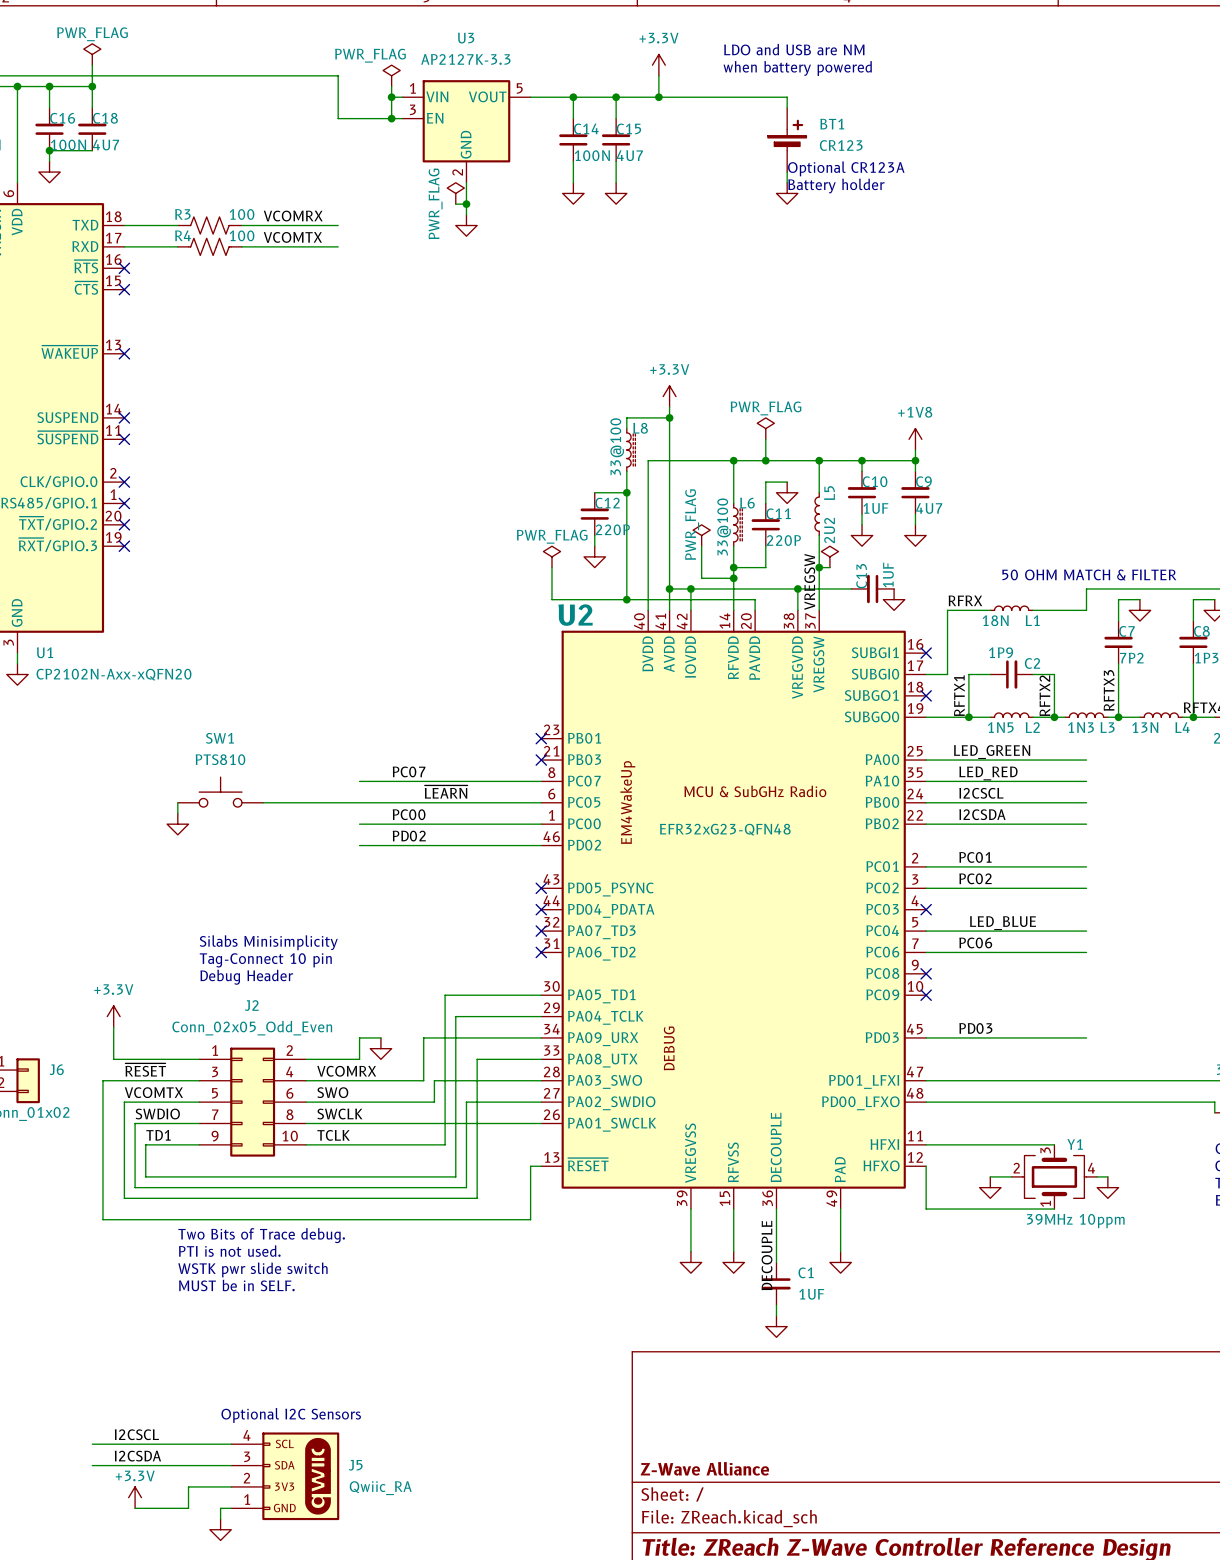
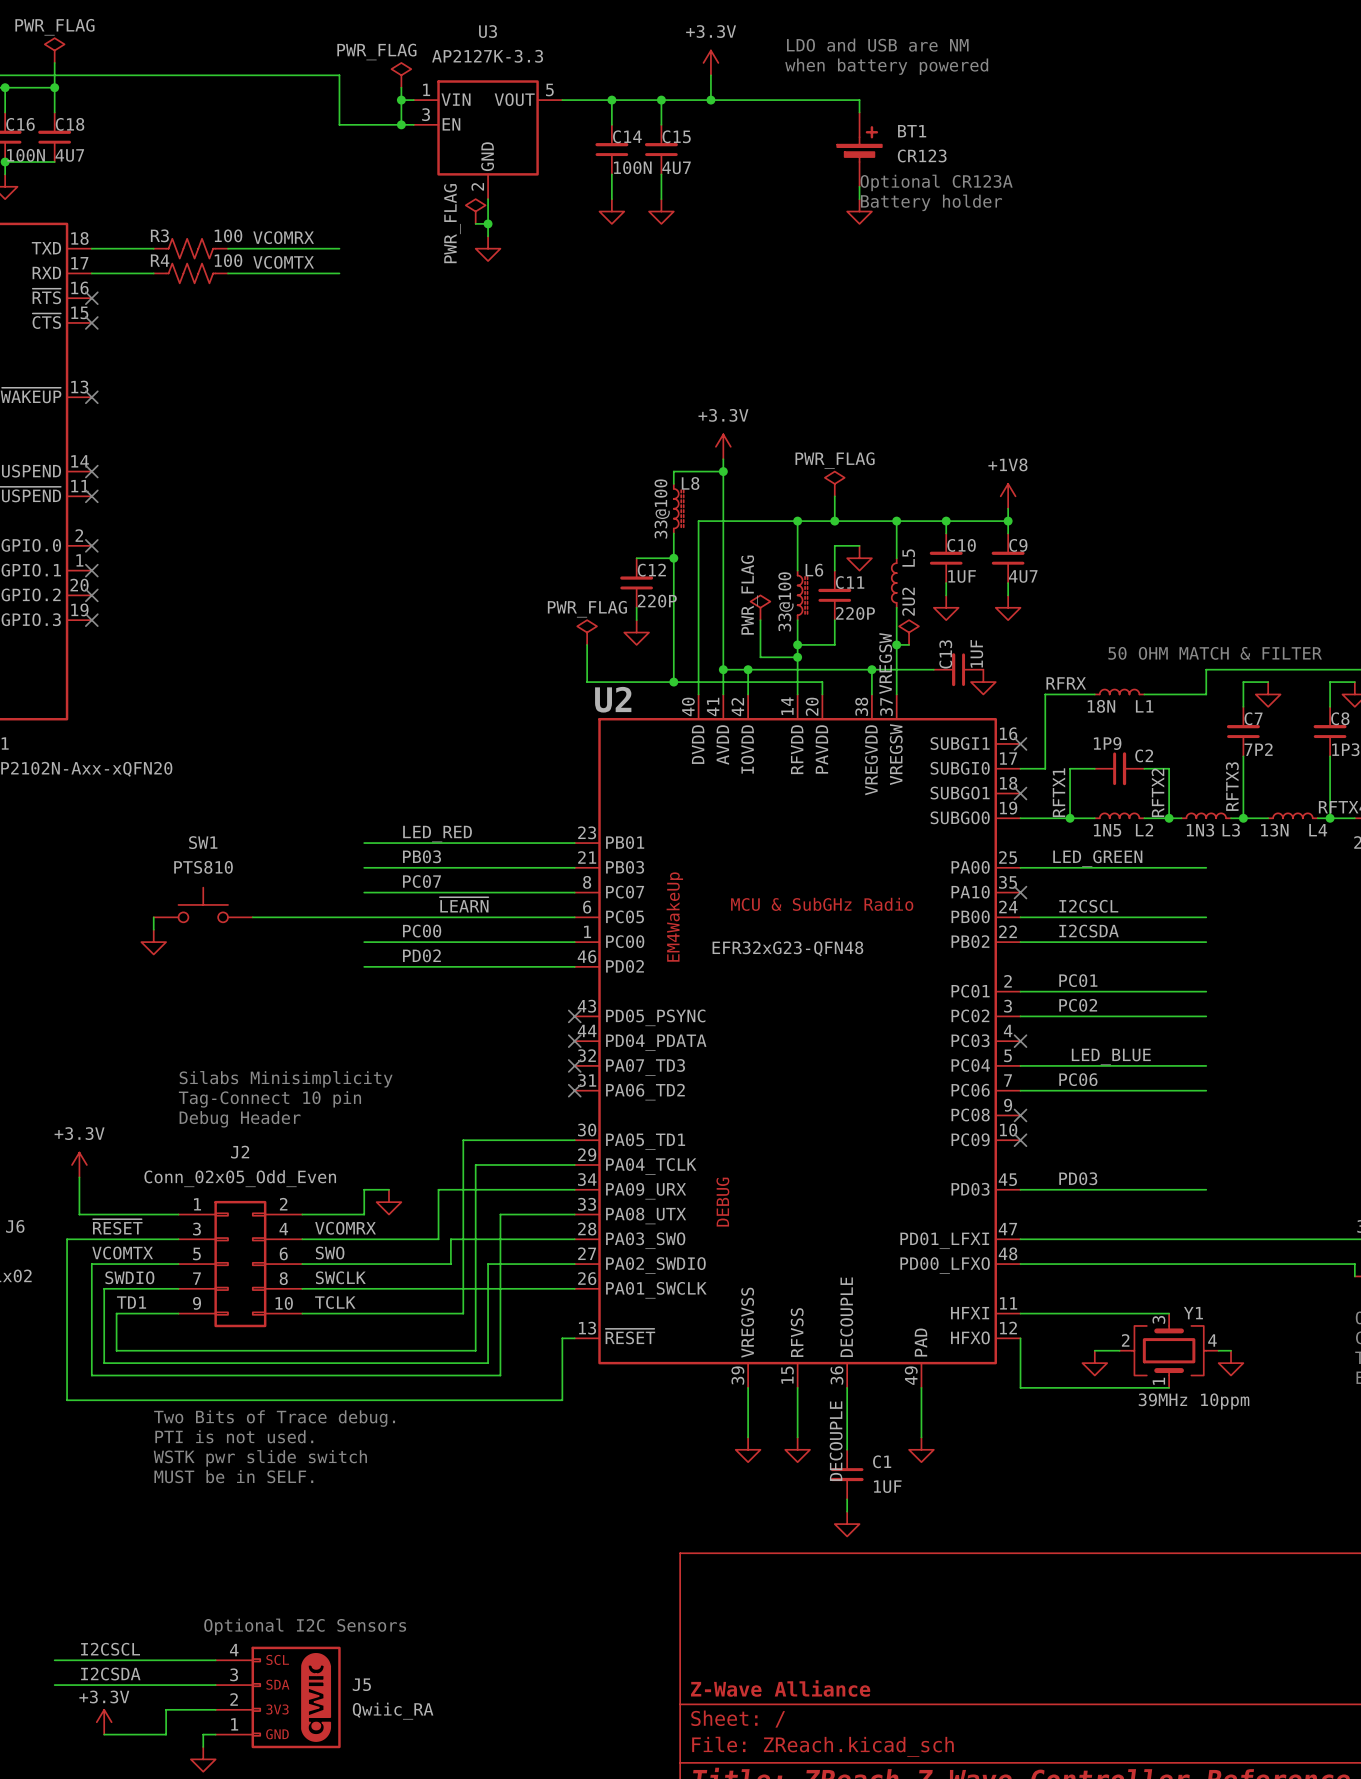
label: none -> LED_RED (437, 834)
wire: none -> (364, 843) (574, 843)
no-connect mark: (541, 738) -> none
label: none -> PB03 (422, 856)
wire: none -> (364, 867) (574, 867)
no-connect mark: (541, 760) -> none
label: LED_RED (988, 773) -> none
wire: (926, 781) (1086, 781) -> none
no-connect mark: none -> (1020, 892)

